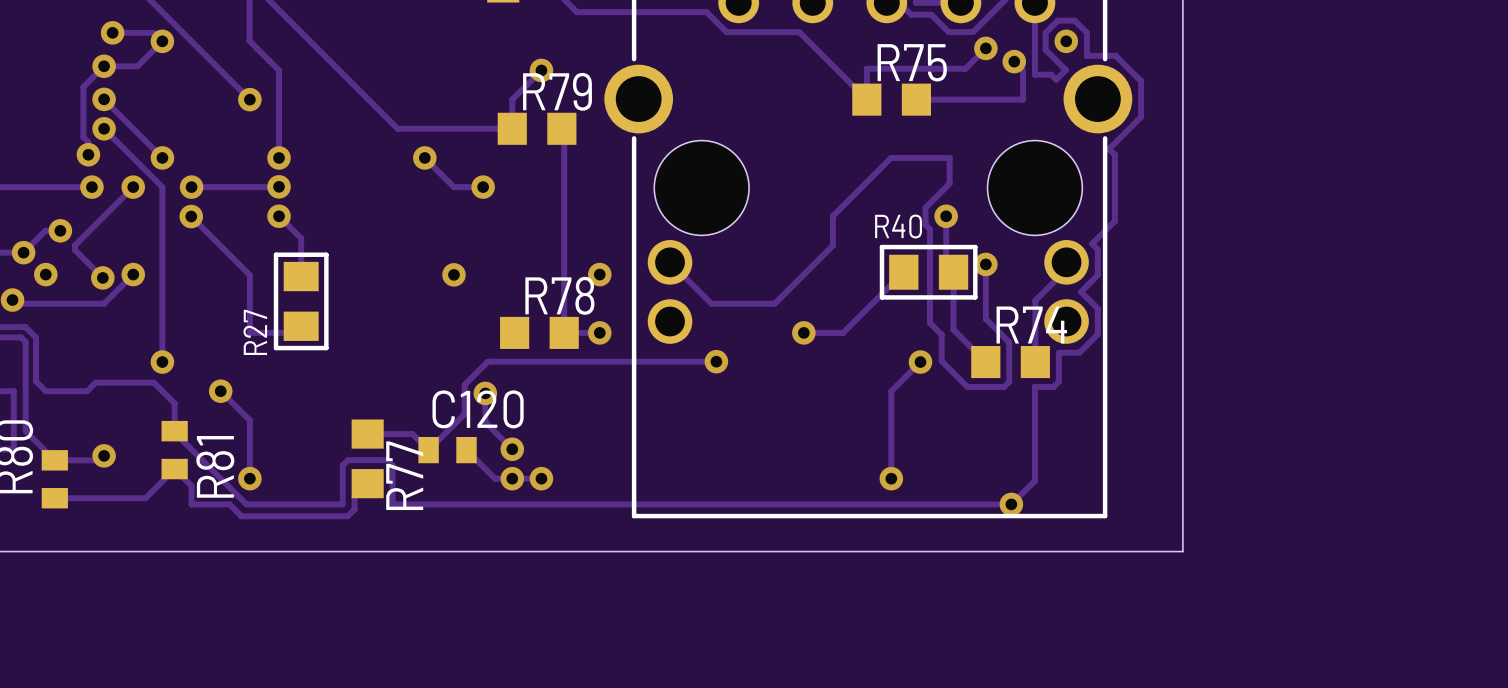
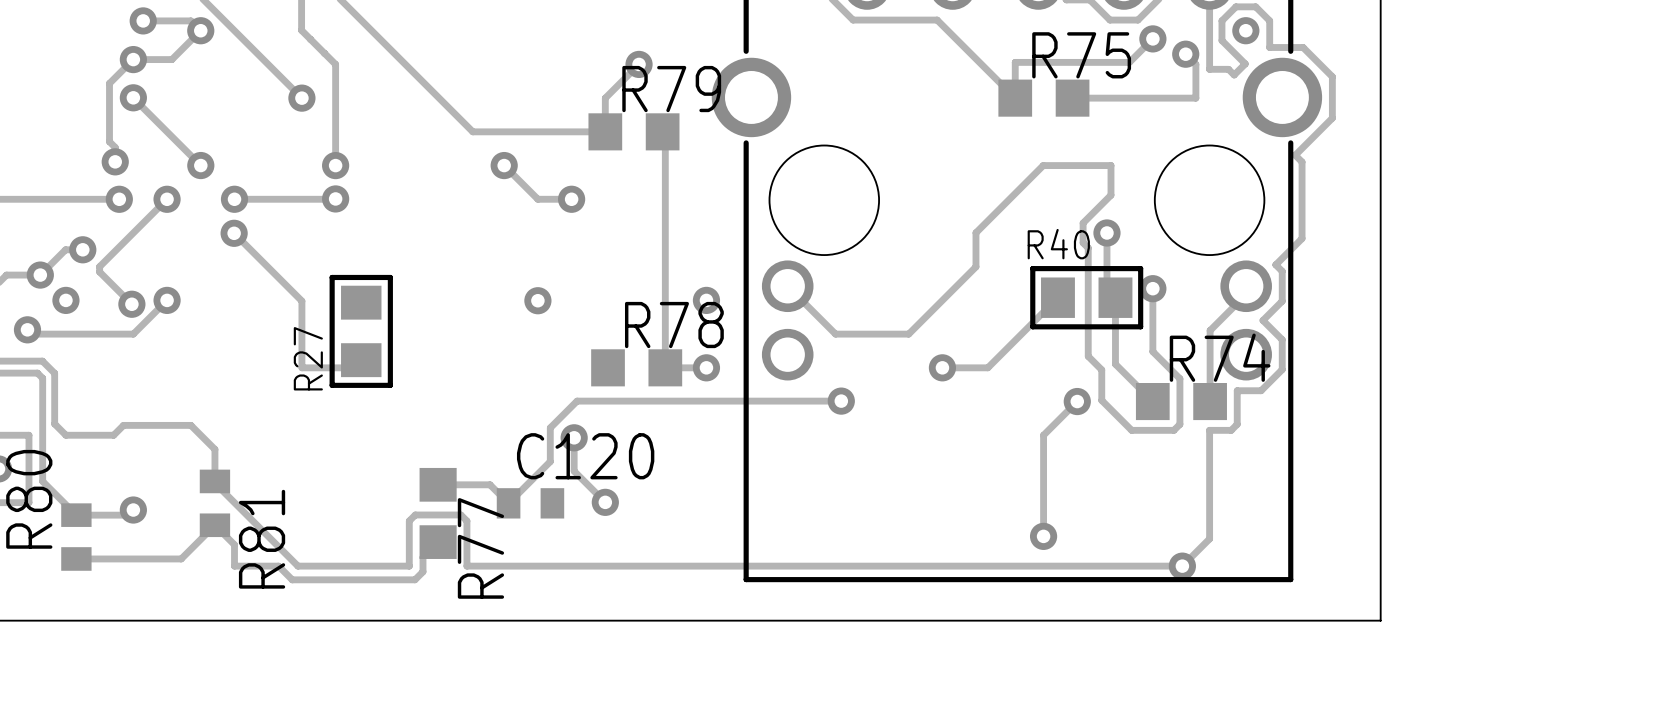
track: (104, 128) (162, 187) (162, 362) -> none
via: (104, 128) -> none
track: (279, 216) (301, 238) (301, 276) -> none
via: (279, 216) -> none
via: (162, 362) -> none
track: (220, 391) (249, 420) (249, 478) -> none
via: (220, 391) -> none
track: (466, 450) (495, 478) (541, 478) -> none
via: (249, 478) -> none
via: (512, 478) -> none
via: (541, 478) -> none

